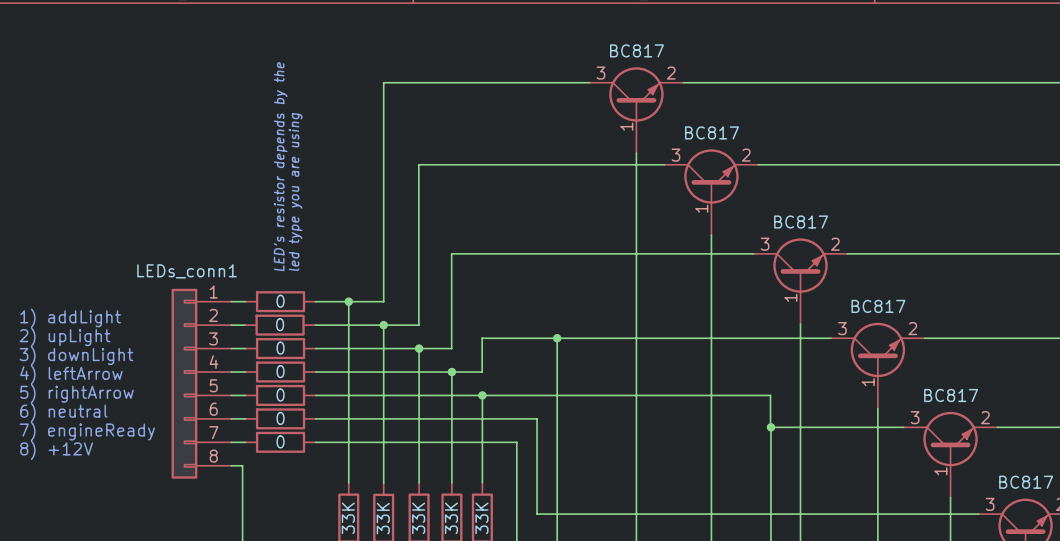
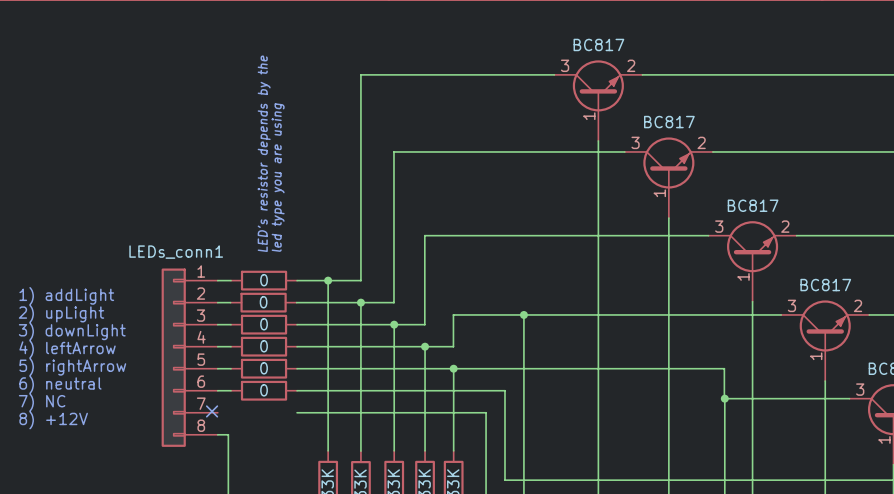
text: 7) engineReady (87, 431) -> 7) NC (42, 402)
no-connect mark: none -> (212, 411)
wire: (231, 442) (245, 442) -> none
part: 0 (280, 442) -> none

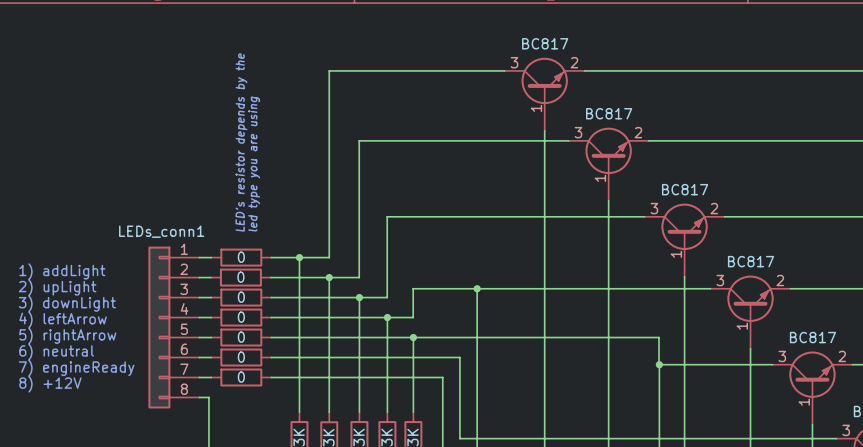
text: 7) NC (42, 402) -> 7) engineReady (76, 368)
no-connect mark: (212, 411) -> none
wire: none -> (199, 377) (211, 377)
part: none -> 0 (241, 377)

